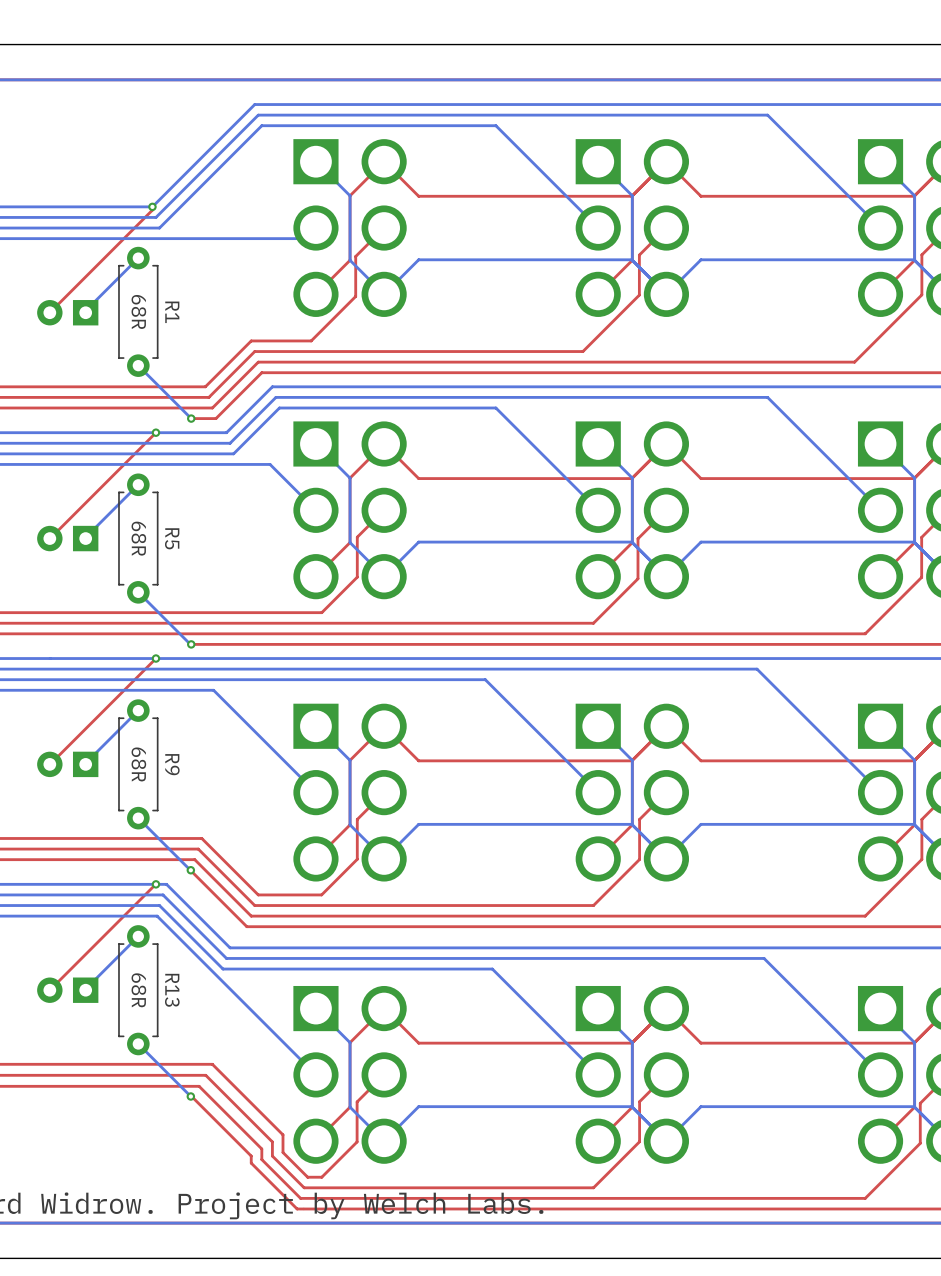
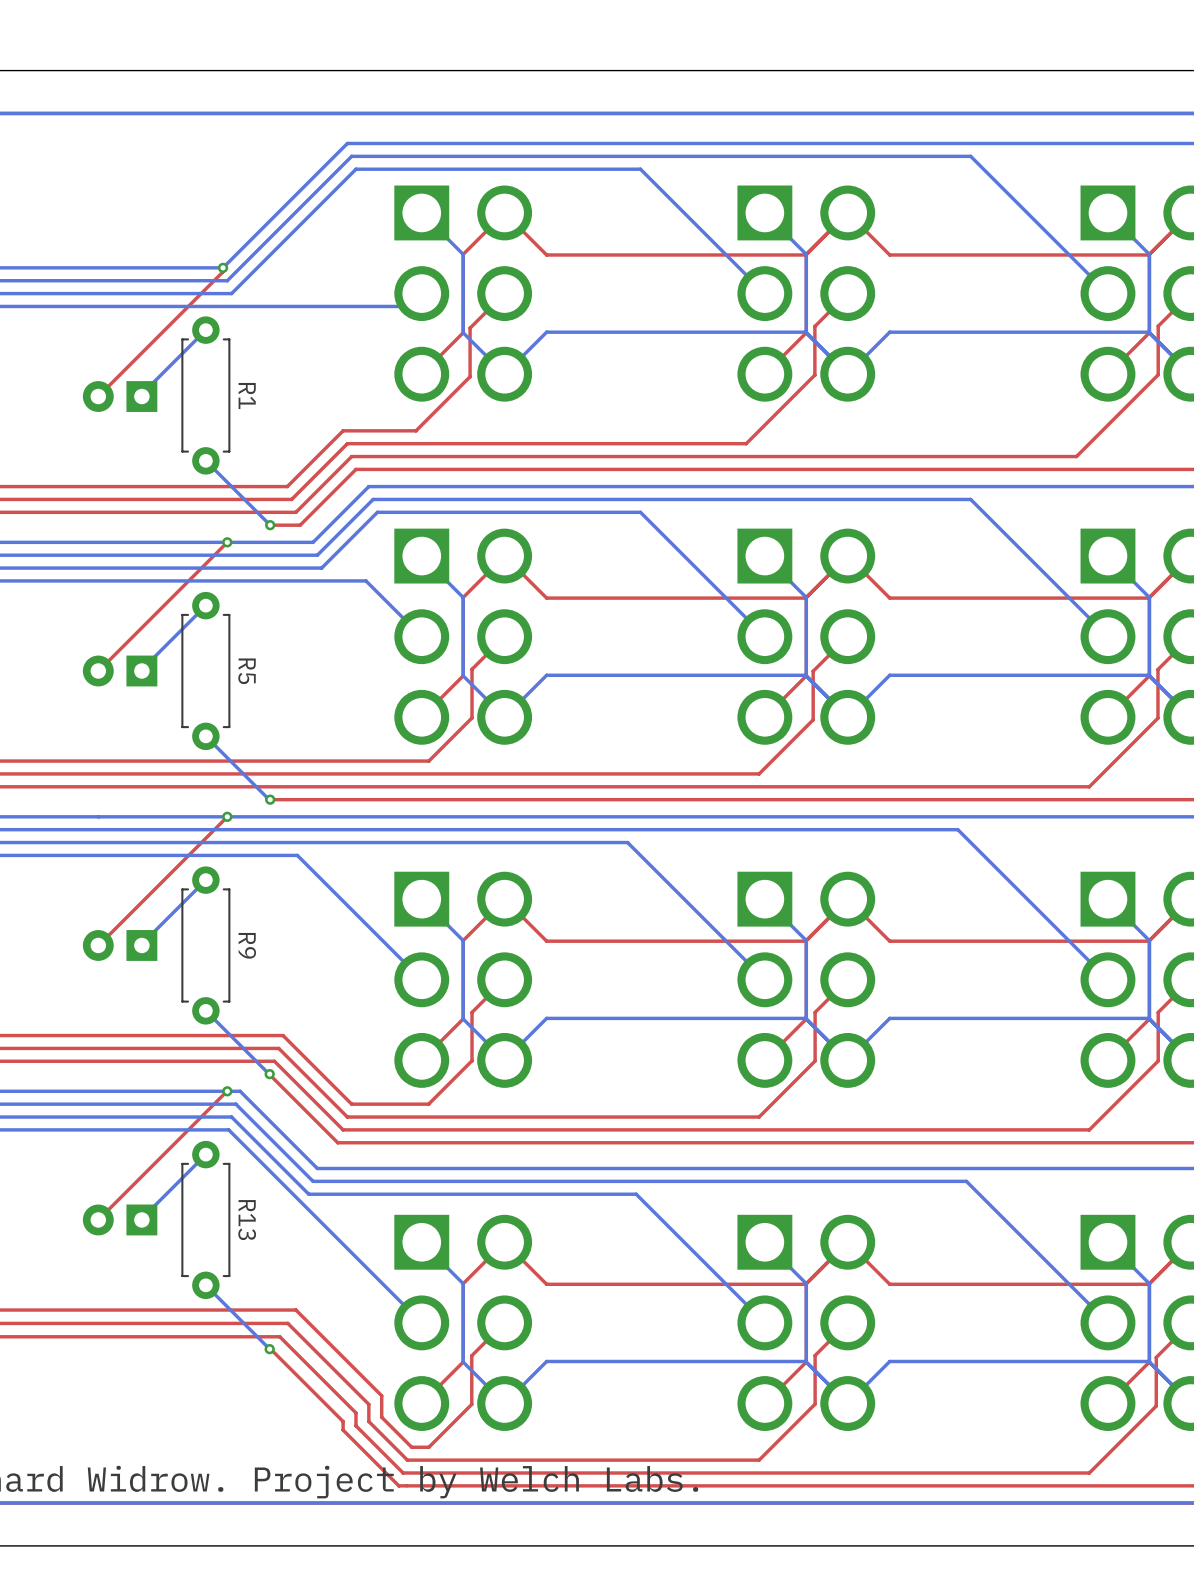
R1 text: 68R (138, 312) -> none
R5 text: 68R (138, 538) -> none
R9 text: 68R (138, 764) -> none
R13 text: 68R (138, 990) -> none

